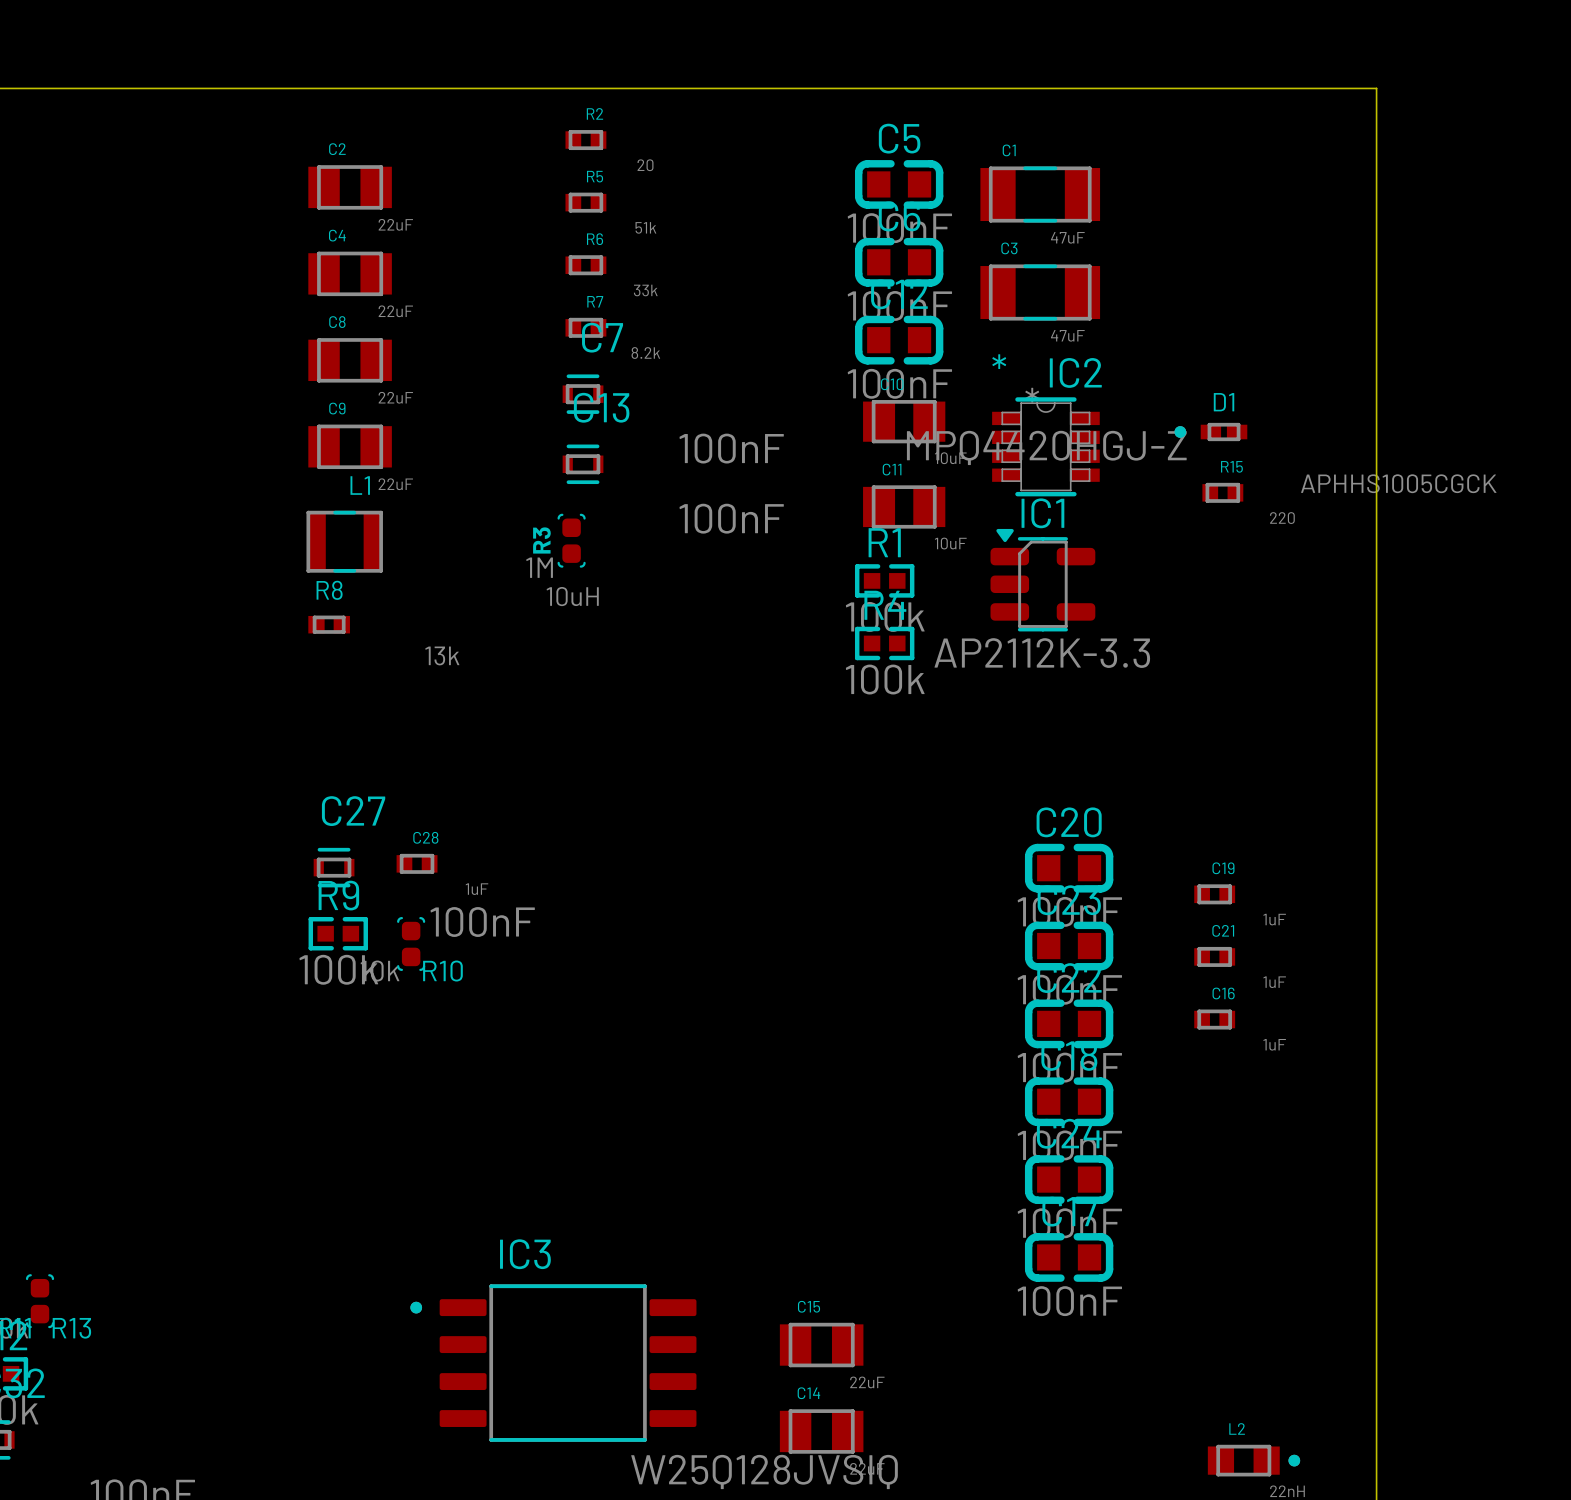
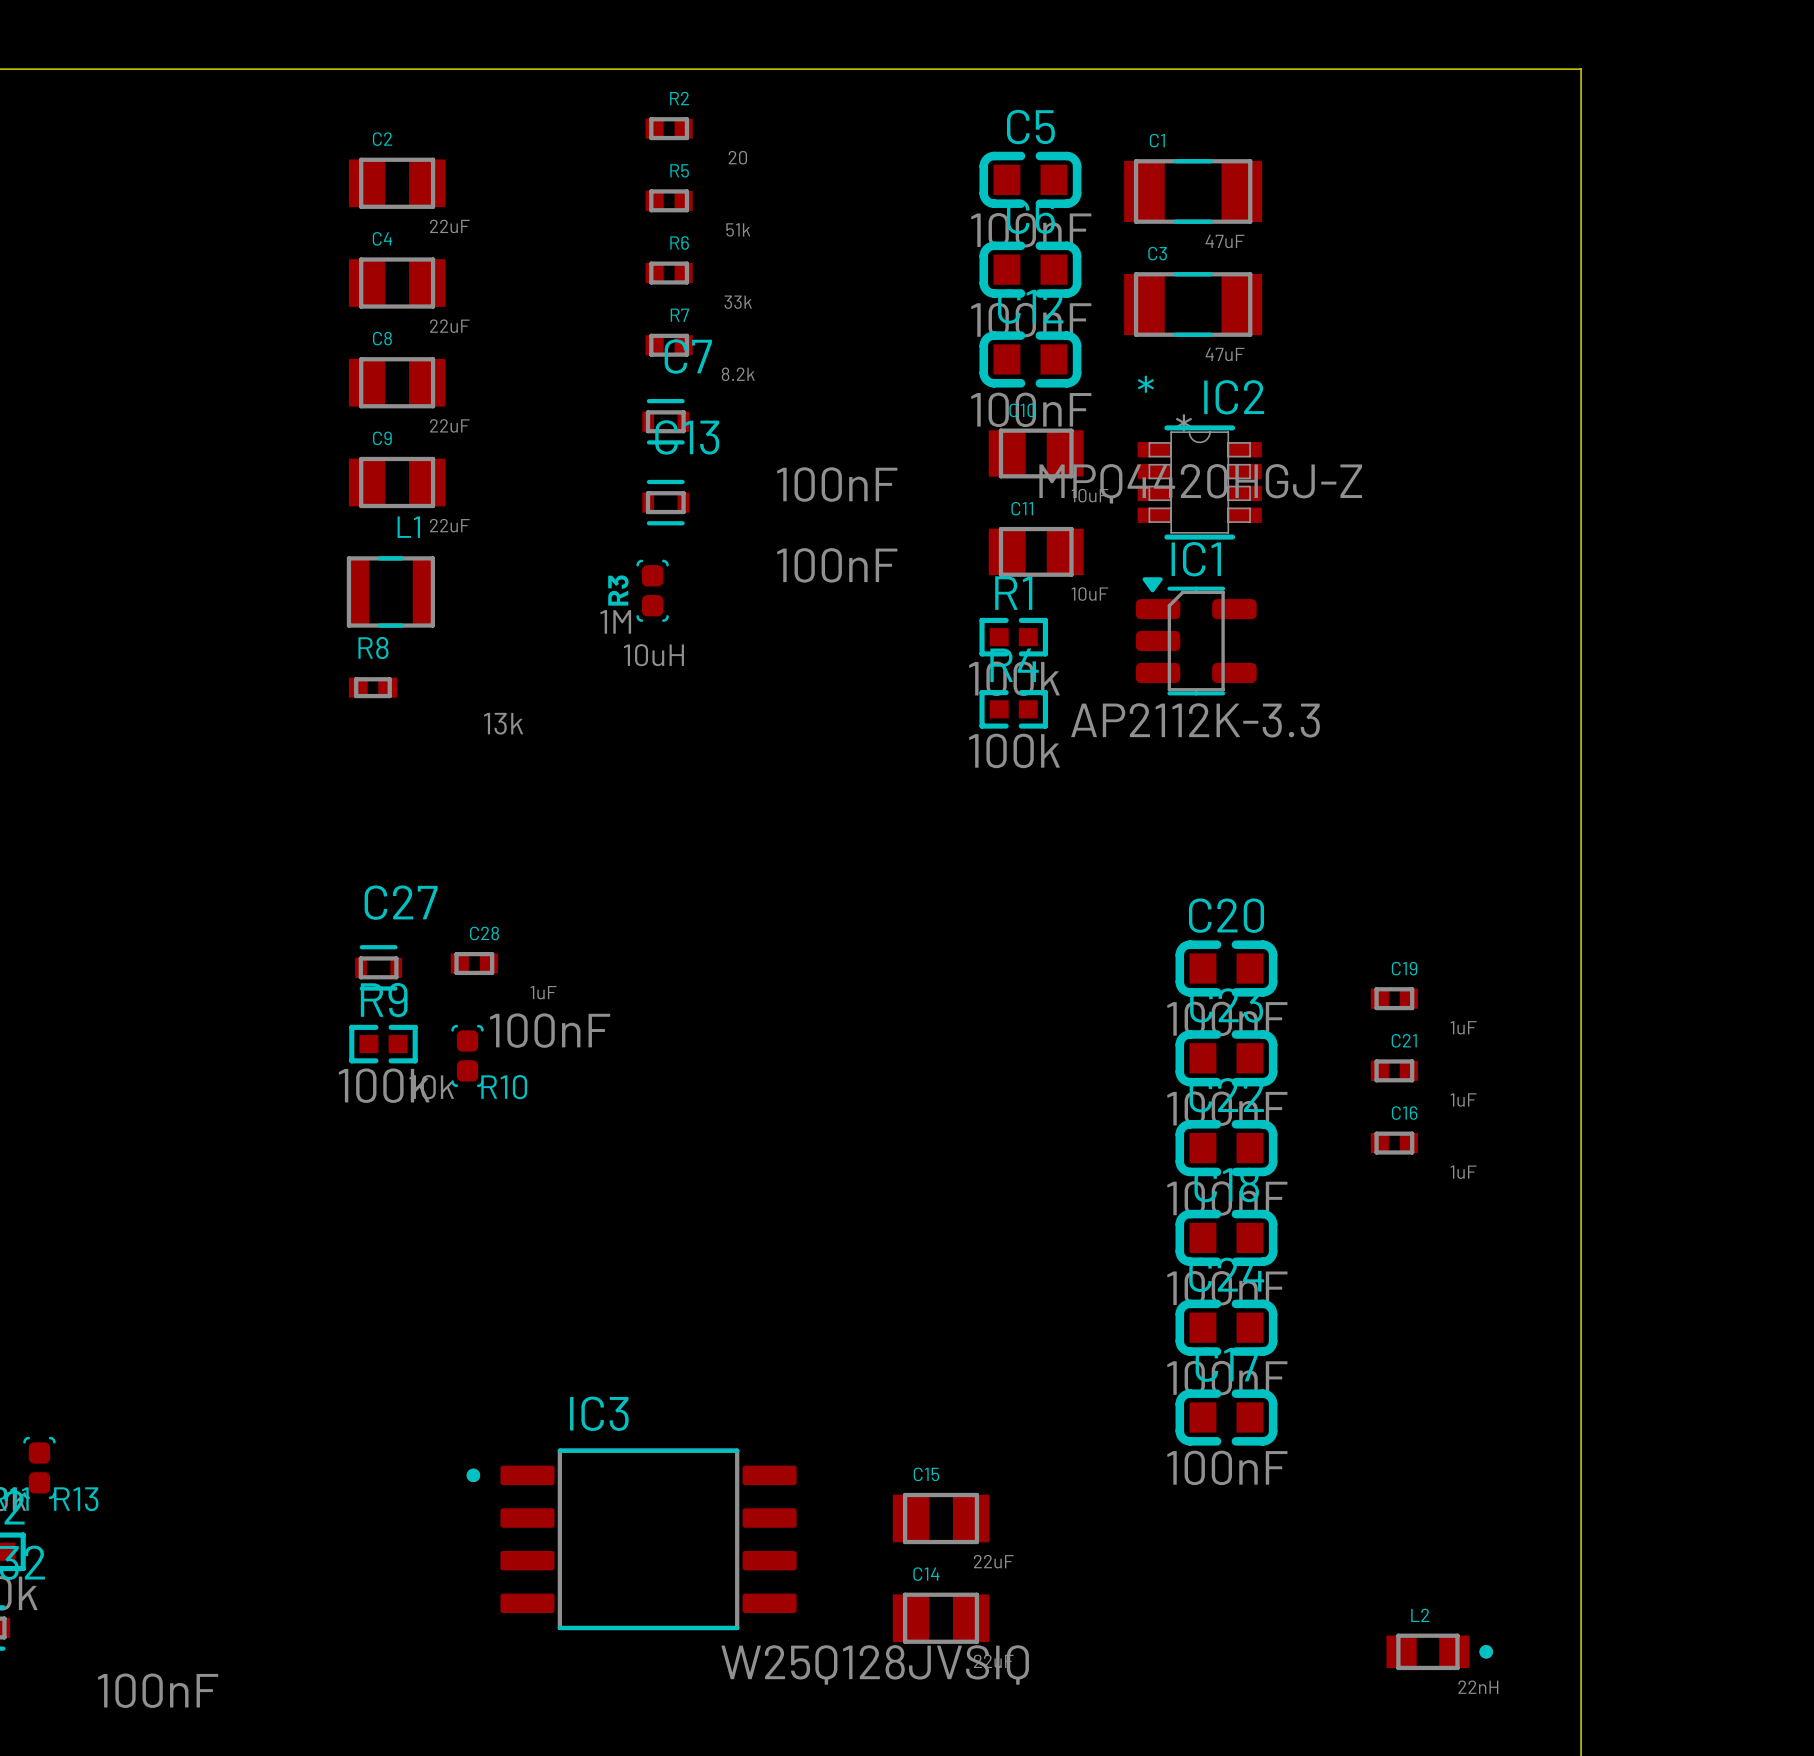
D1: APHHS1005CGCK (1210, 432) -> none
R15: 220 (1222, 492) -> none

